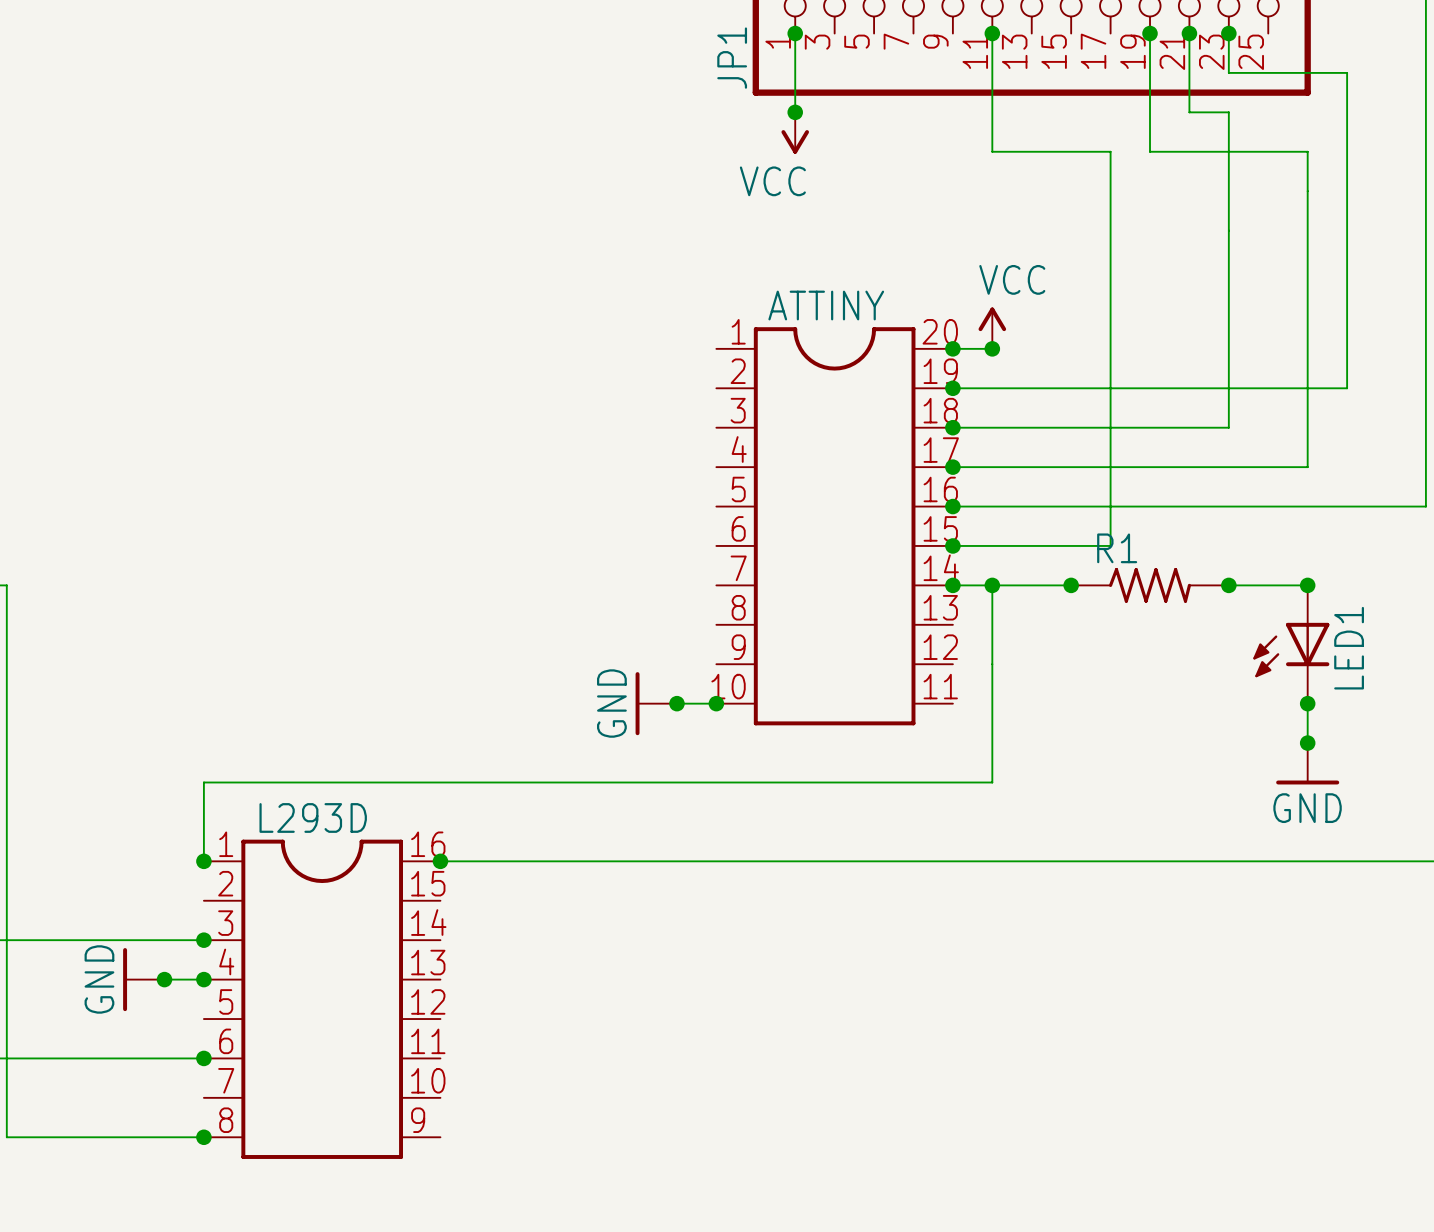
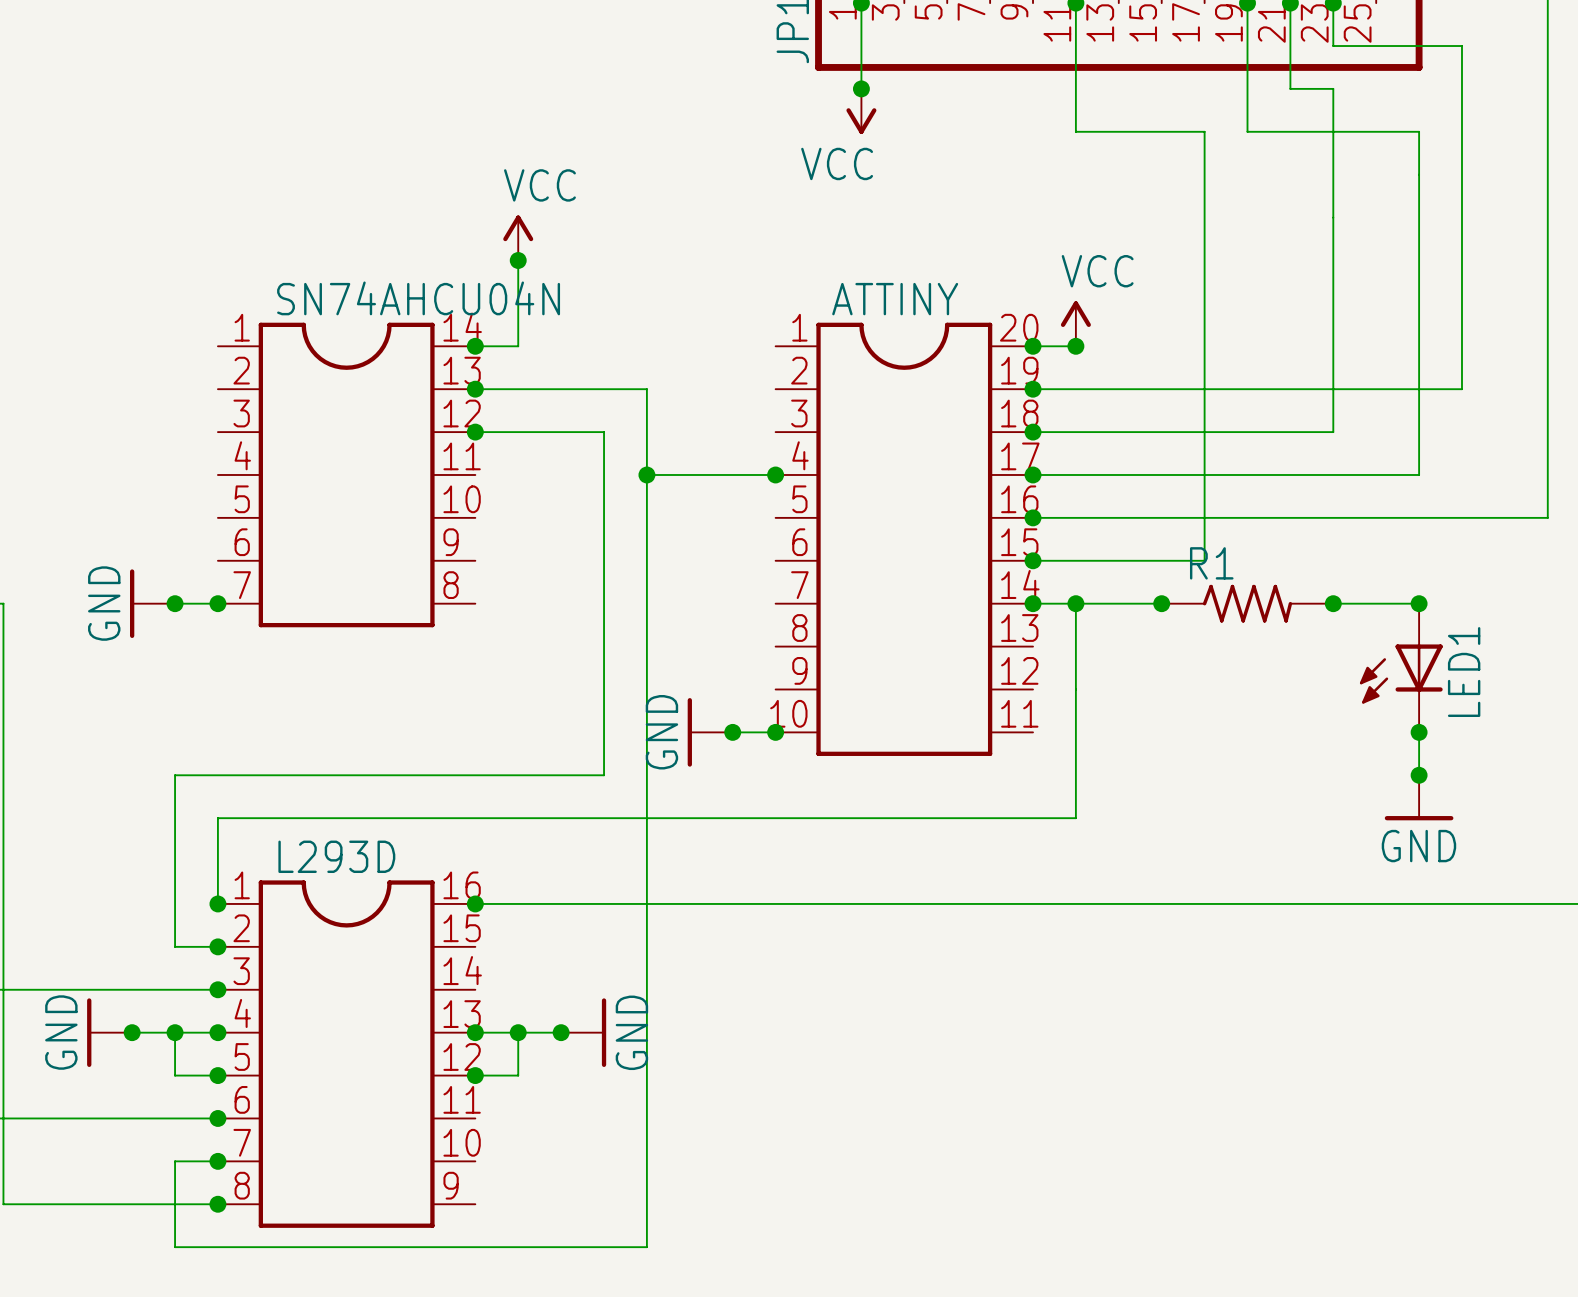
power symbol: none -> VCC (518, 237)
wire: none -> (518, 260) (518, 346) (475, 346)
junction: none -> (518, 260)
junction: none -> (475, 346)
wire: none -> (475, 389) (646, 389) (646, 1247) (175, 1247) (175, 1161) (217, 1161)
junction: none -> (475, 389)
wire: none -> (475, 432) (604, 432) (604, 775) (175, 775) (175, 946) (217, 946)
junction: none -> (475, 432)
SN74AHCU04N: none -> (346, 474)
wire: none -> (646, 474) (775, 474)
junction: none -> (646, 474)
junction: none -> (775, 474)
power symbol: none -> GND (152, 603)
wire: none -> (175, 603) (217, 603)
junction: none -> (175, 603)
junction: none -> (217, 603)
junction: none -> (217, 946)
wire: none -> (132, 1032) (175, 1032) (175, 1075) (217, 1075)
junction: none -> (132, 1032)
power symbol position: GND (143, 979) -> GND (109, 1032)
wire: none -> (475, 1032) (561, 1032)
junction: none -> (475, 1032)
wire: none -> (518, 1032) (518, 1075) (475, 1075)
junction: none -> (518, 1032)
junction: none -> (561, 1032)
power symbol: none -> GND (583, 1032)
junction: none -> (217, 1075)
junction: none -> (475, 1075)
junction: none -> (217, 1161)

